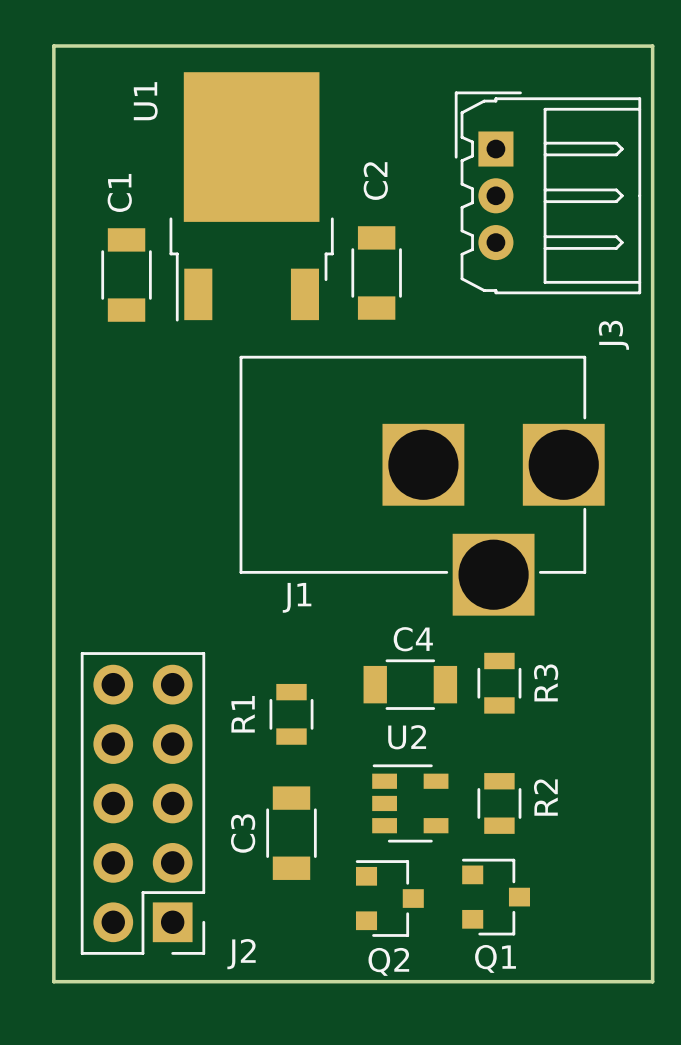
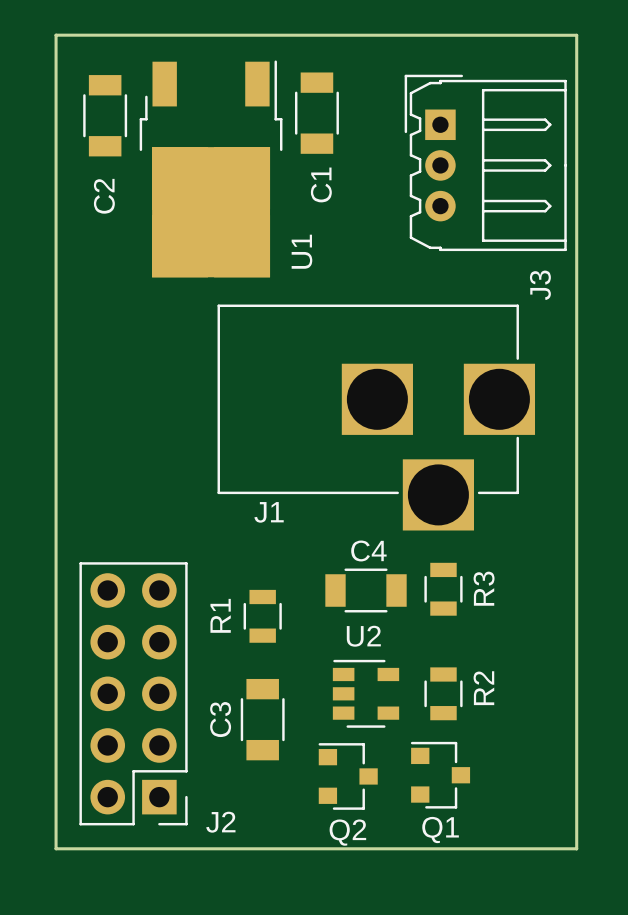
U1 footprint: [169, 72, 334, 322] -> [139, 60, 283, 278]
U1 name position: U1 (145, 101) -> U1 (301, 251)
C2 name position: C2 (375, 181) -> C2 (104, 196)
C1 name position: C1 (119, 192) -> C1 (321, 184)
C2 position: (376, 272) -> (105, 115)
C1 position: (126, 275) -> (316, 113)

